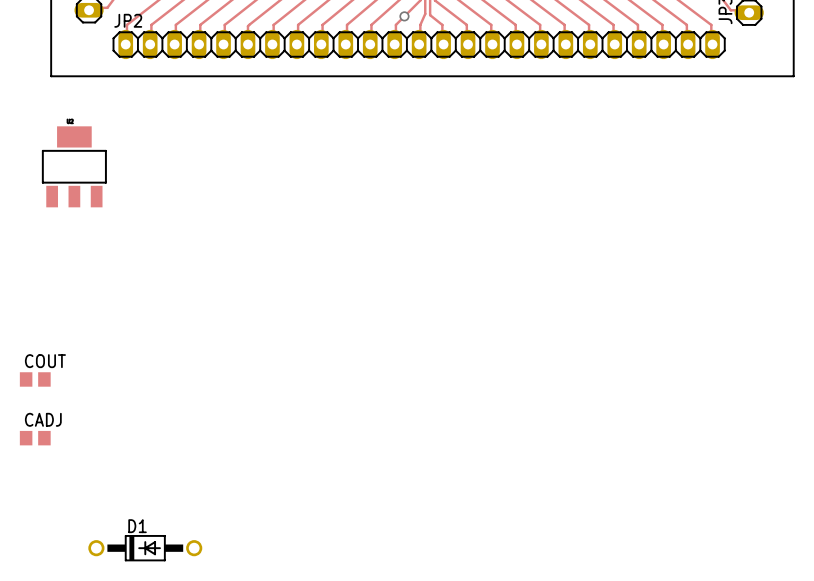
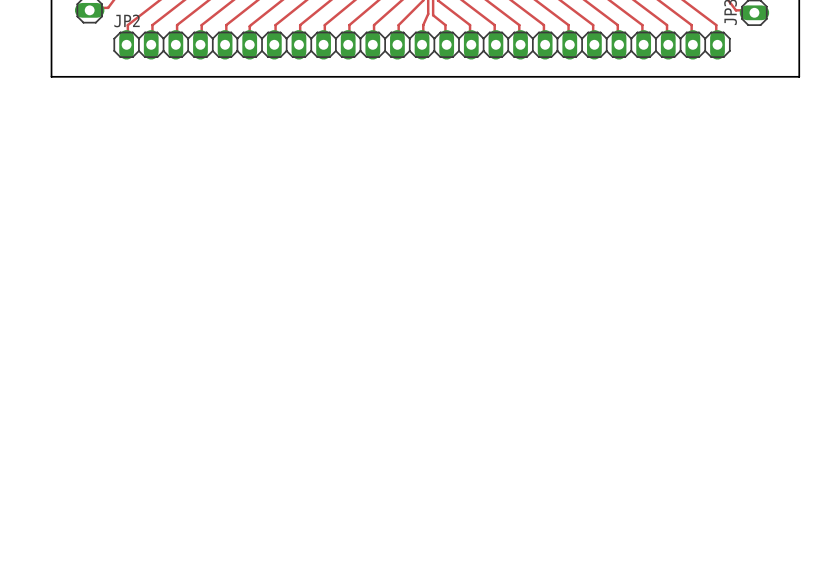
via: (404, 16) -> none
part: (74, 166) -> none
COUT: (35, 379) -> none
CADJ: (35, 438) -> none
D1: (145, 548) -> none

